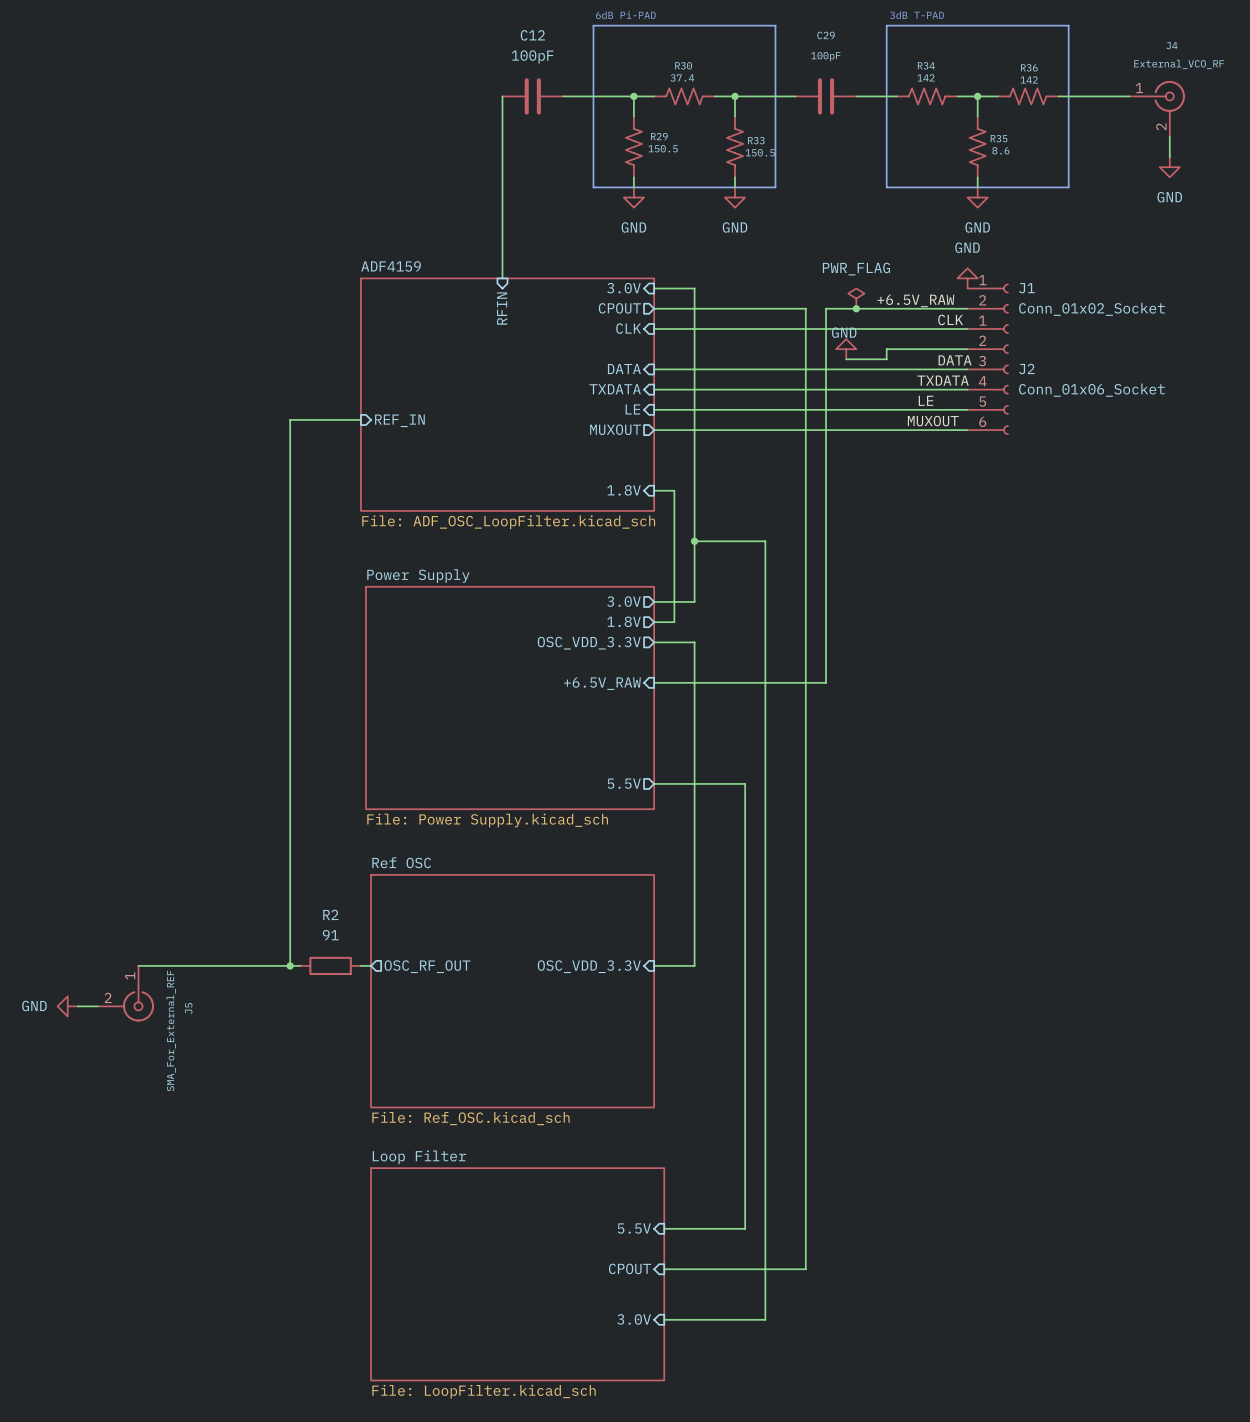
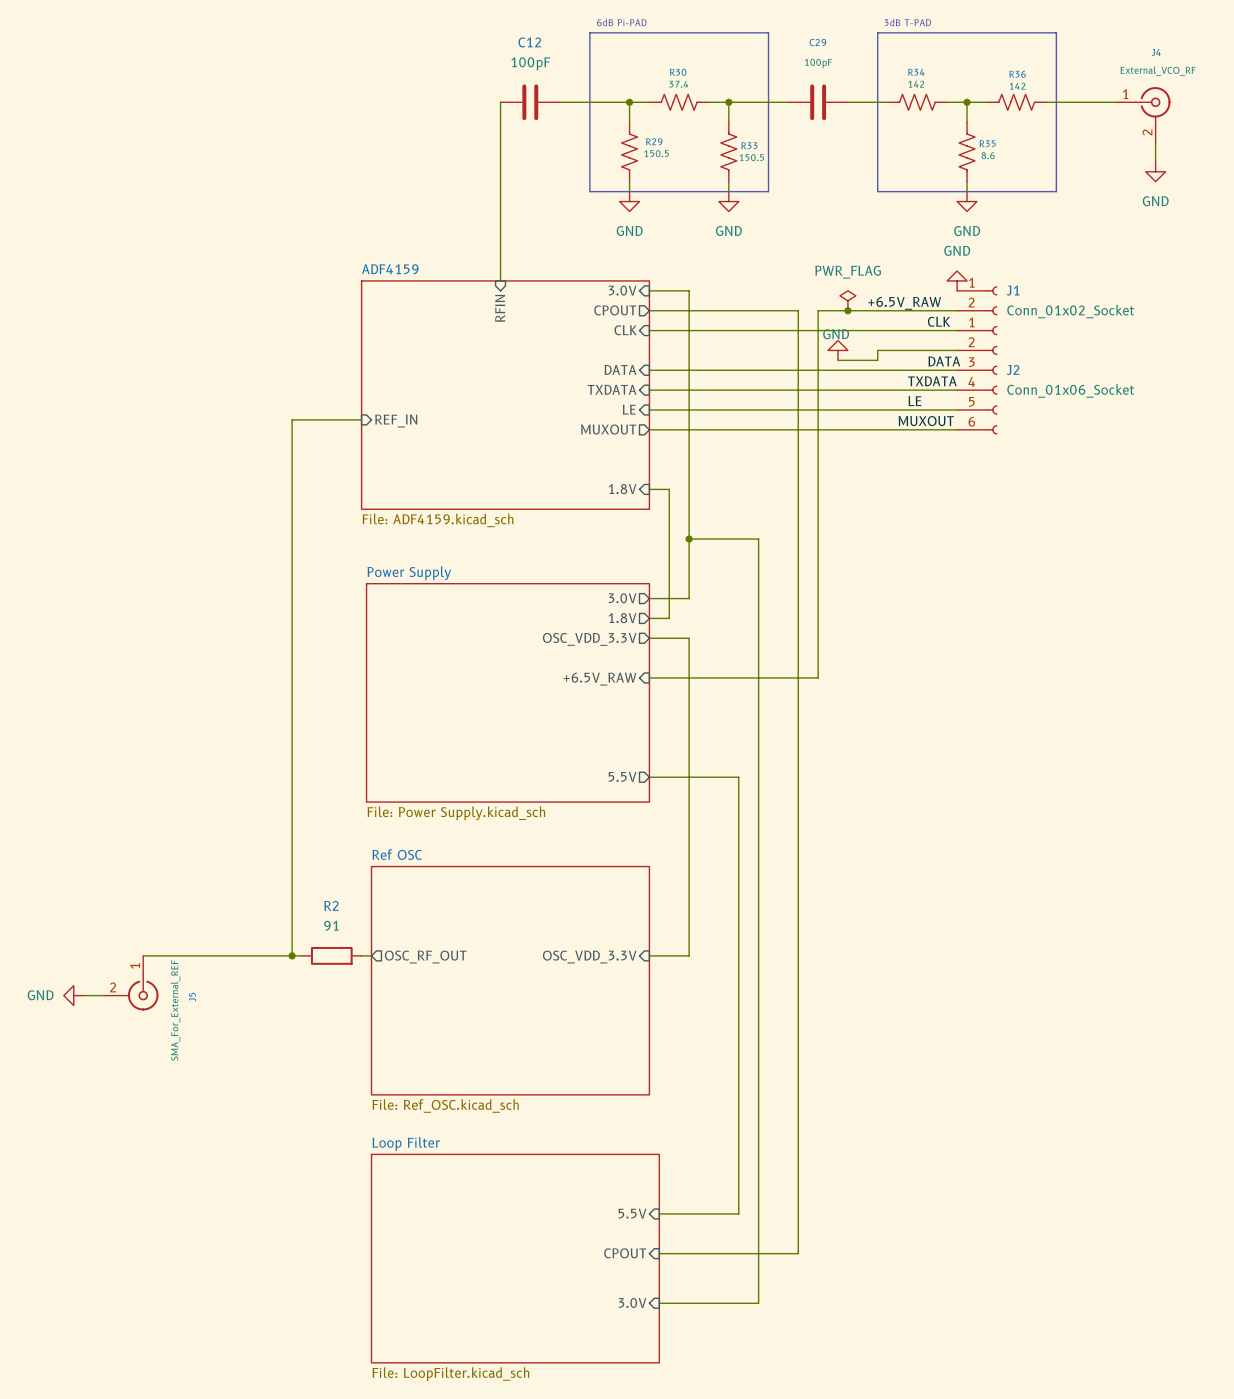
sheet ADF4159 value: File: ADF_OSC_LoopFilter.kicad_sch (508, 522) -> File: ADF4159.kicad_sch (438, 520)

